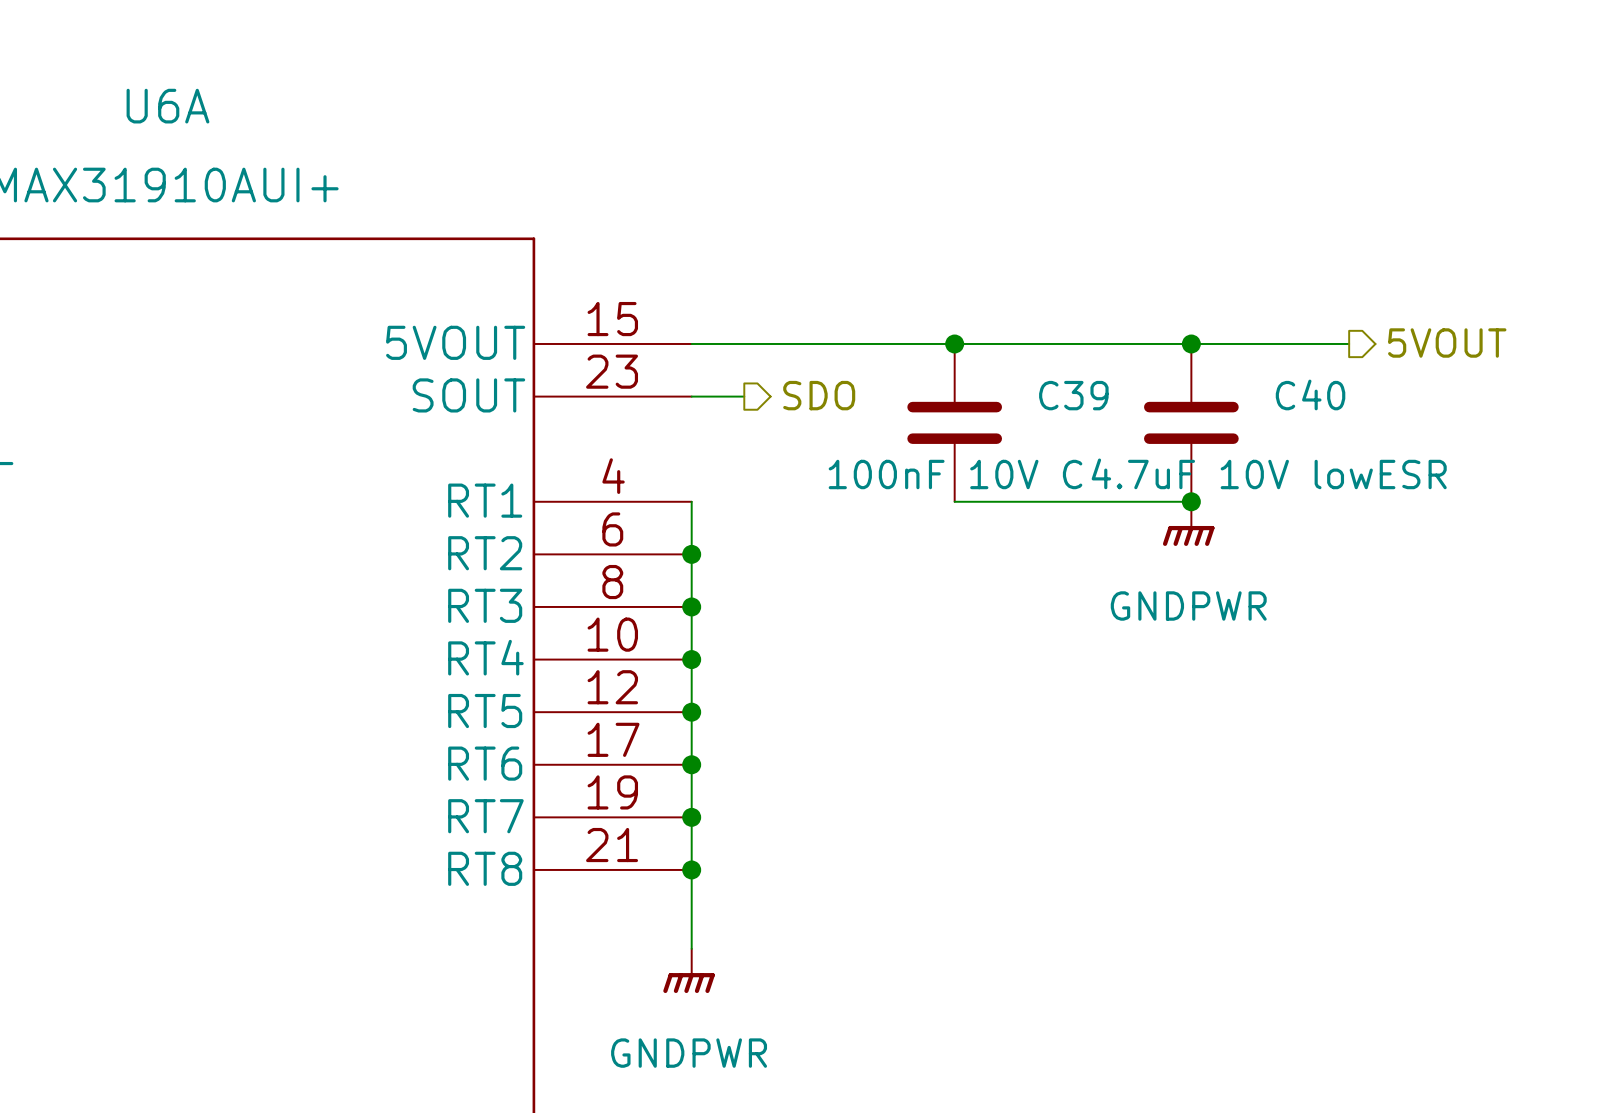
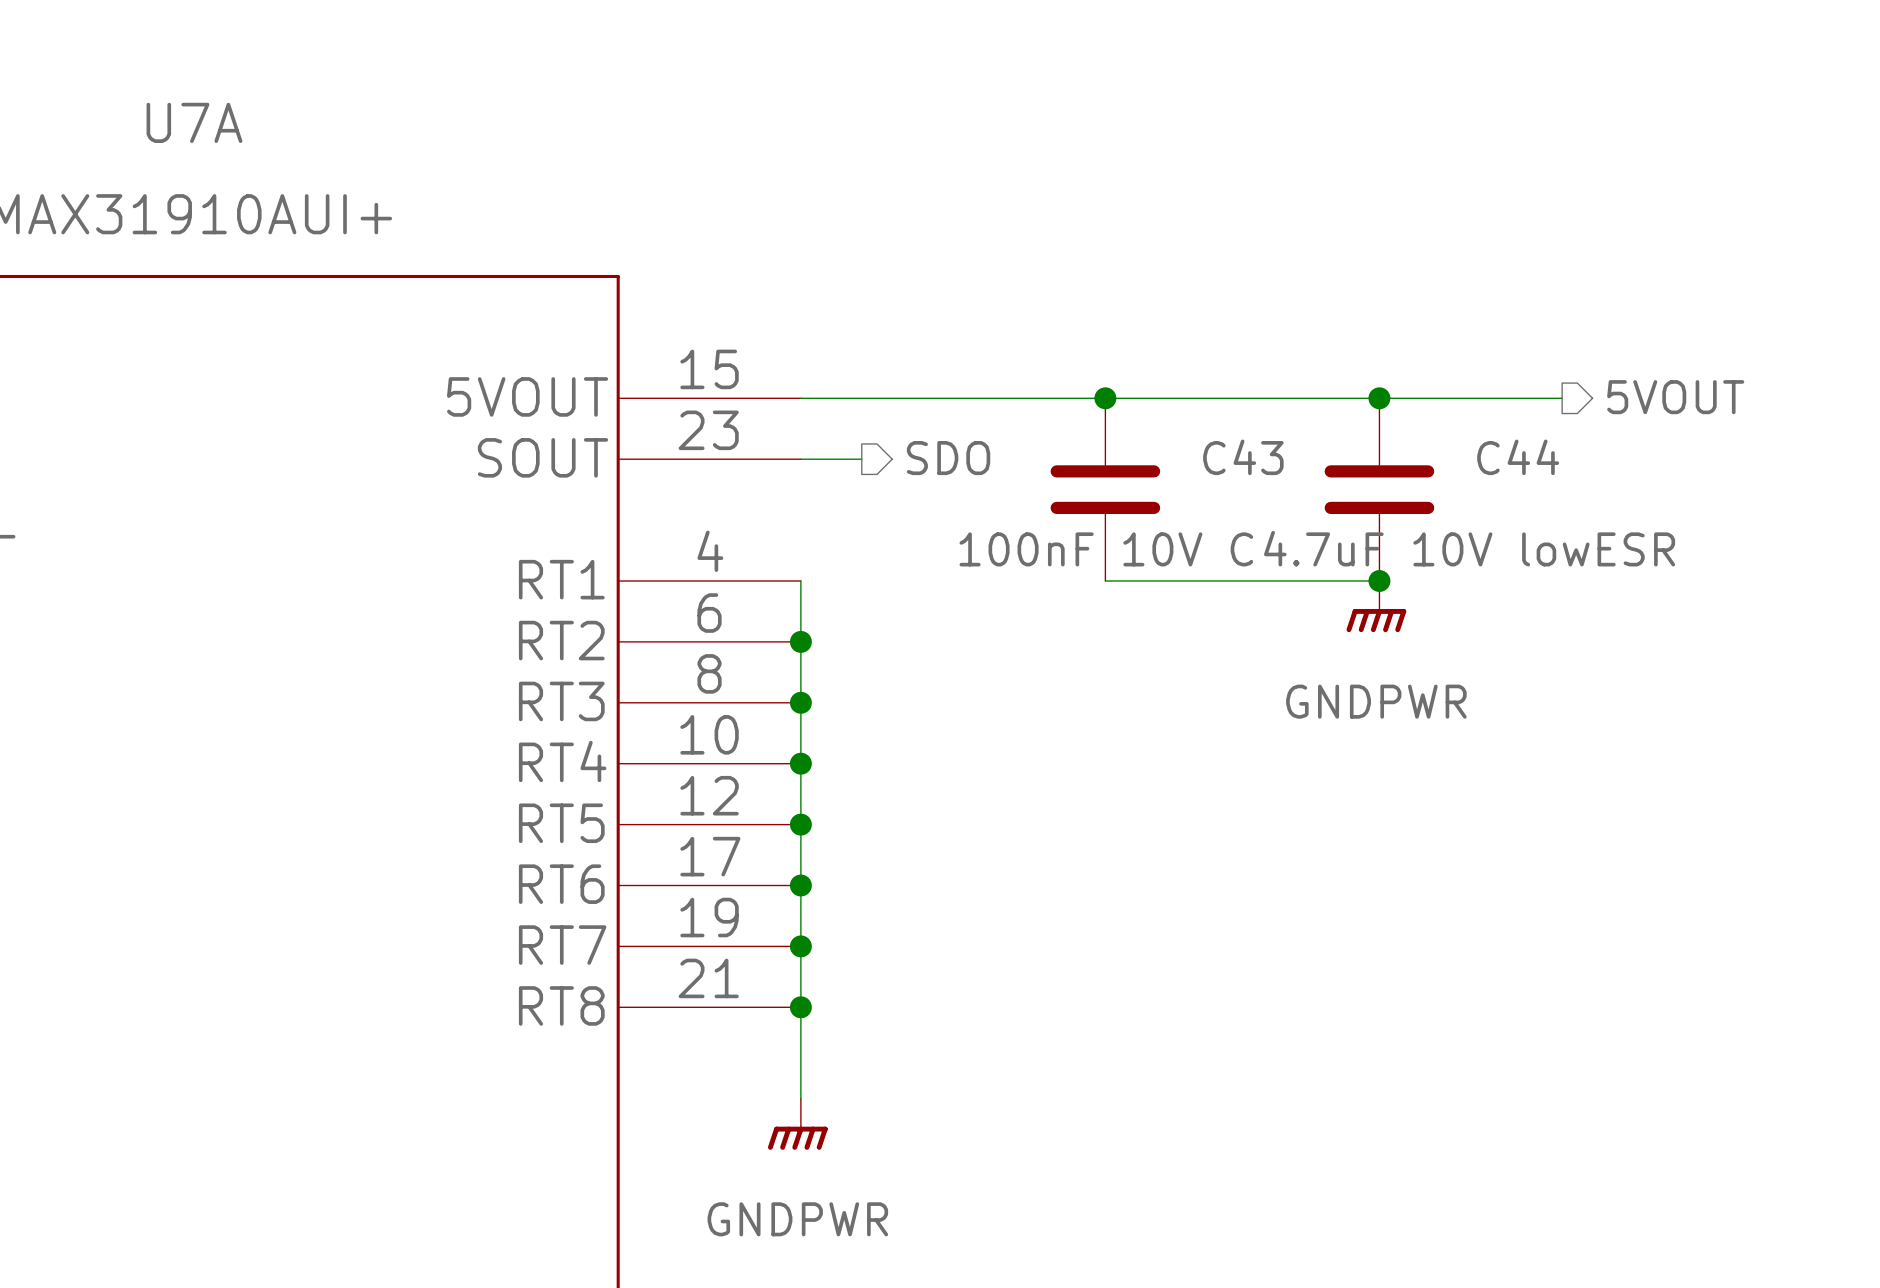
U6A name: U6A (167, 106) -> U7A (194, 122)
C40 name: C40 (1310, 394) -> C44 (1518, 457)
C39 name: C39 (1073, 395) -> C43 (1243, 457)

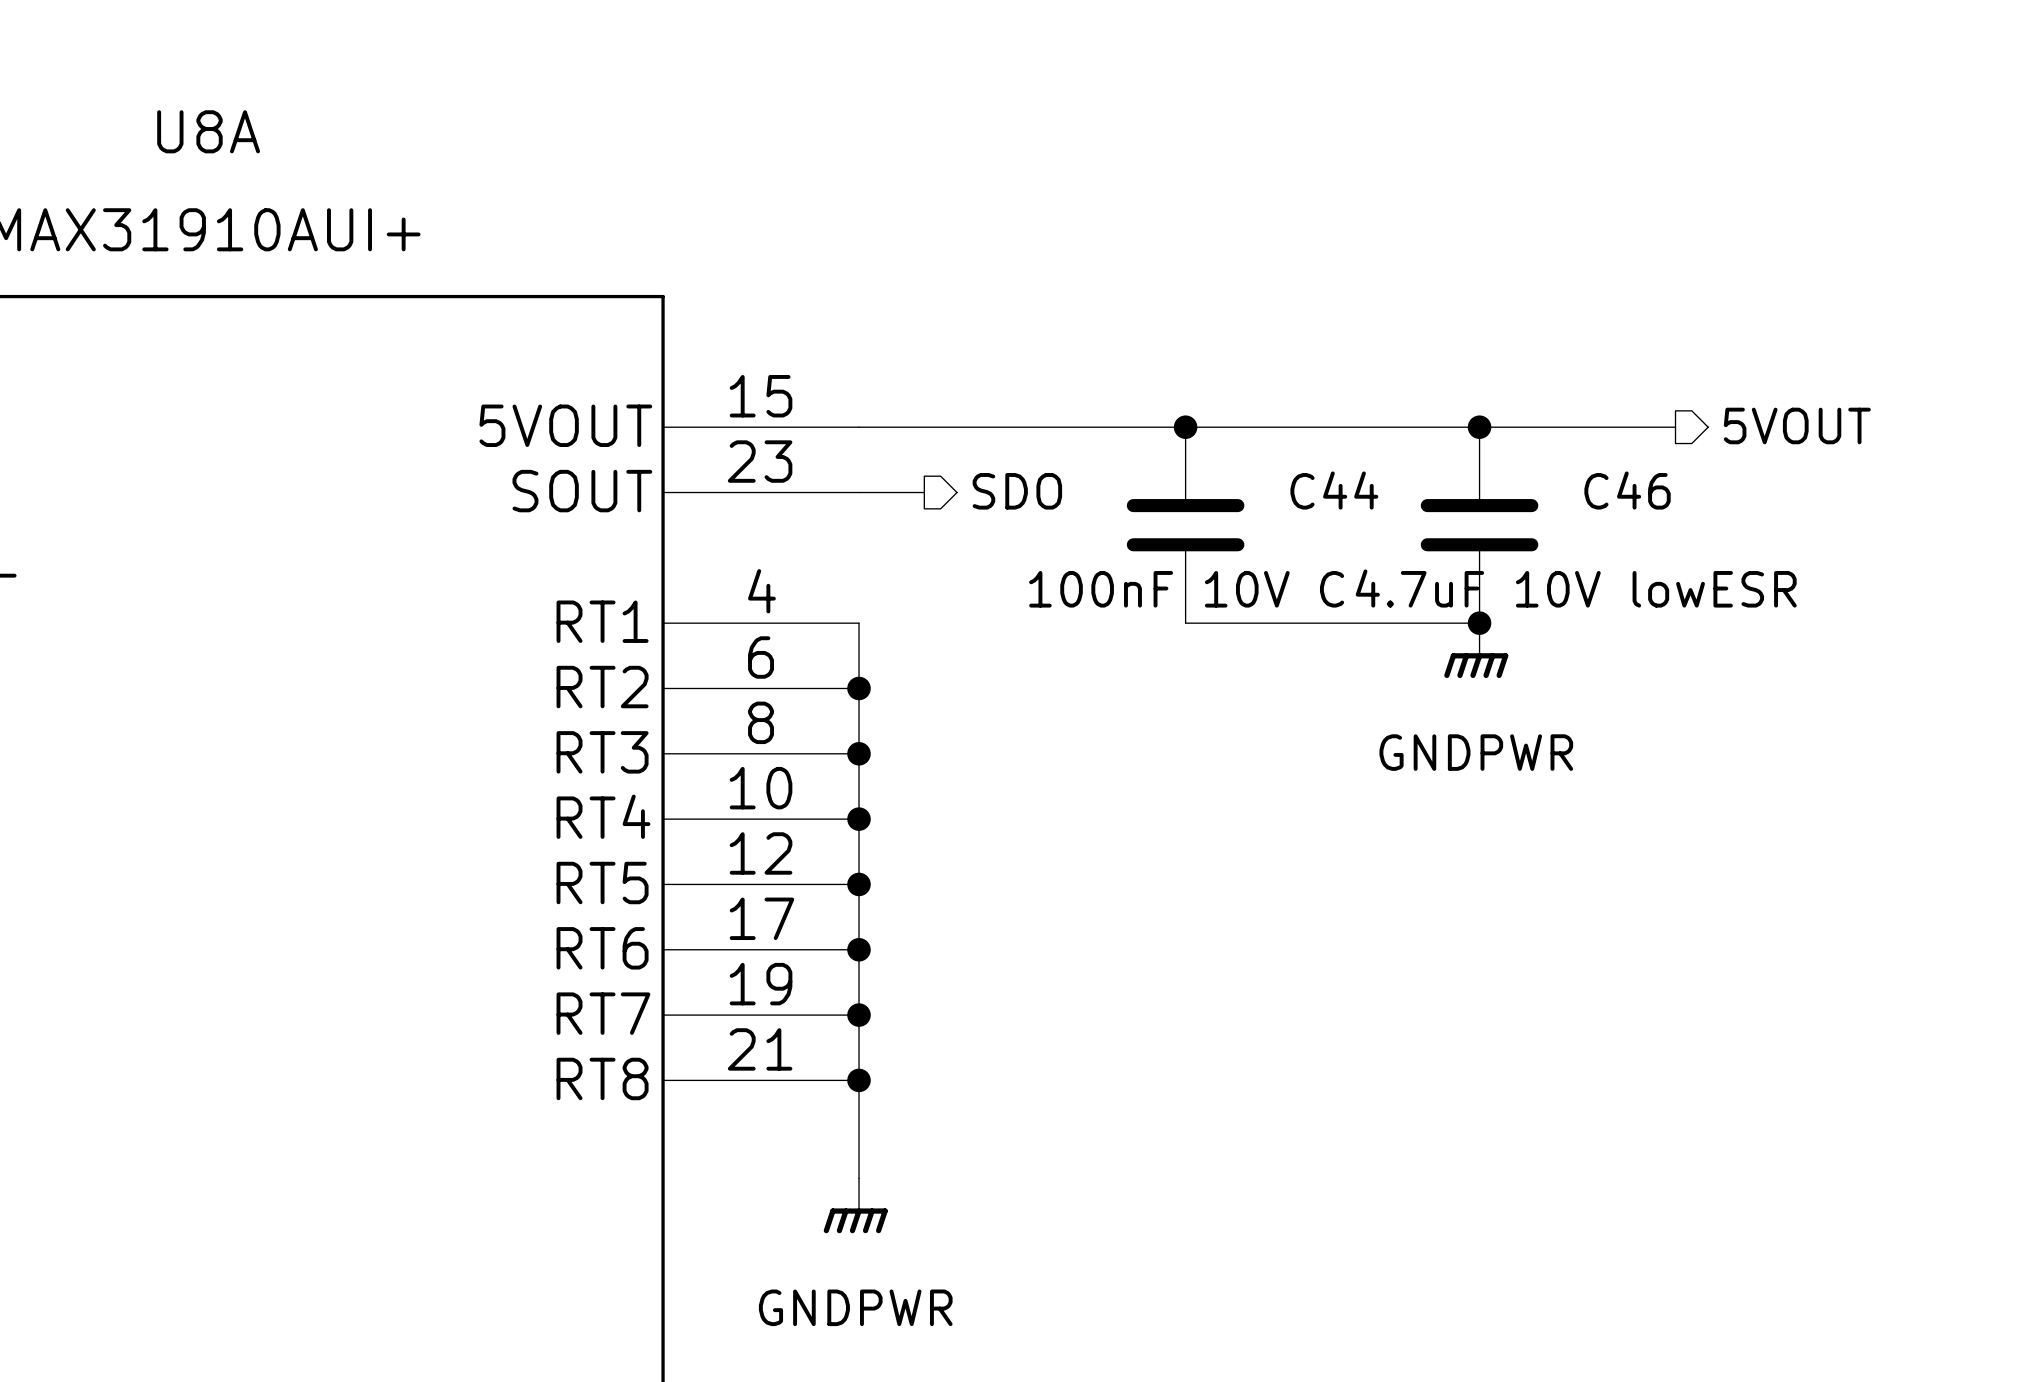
U7A name: U7A (194, 122) -> U8A (208, 131)
C43 name: C43 (1243, 457) -> C44 (1334, 490)
C44 name: C44 (1518, 457) -> C46 (1627, 490)

